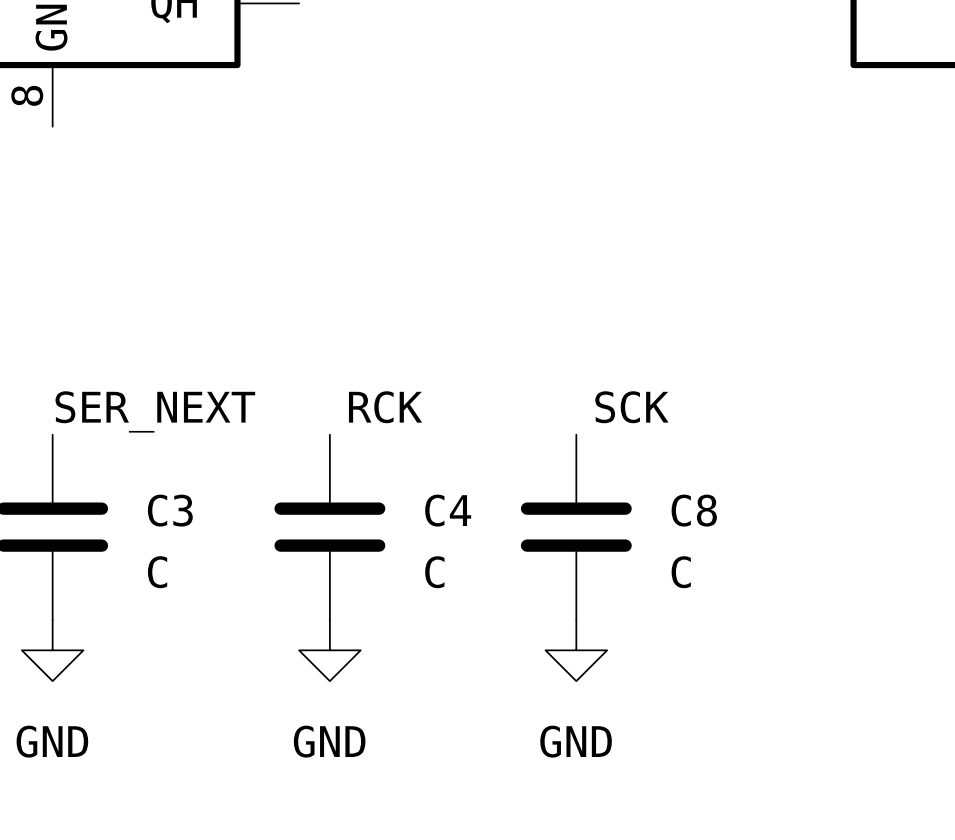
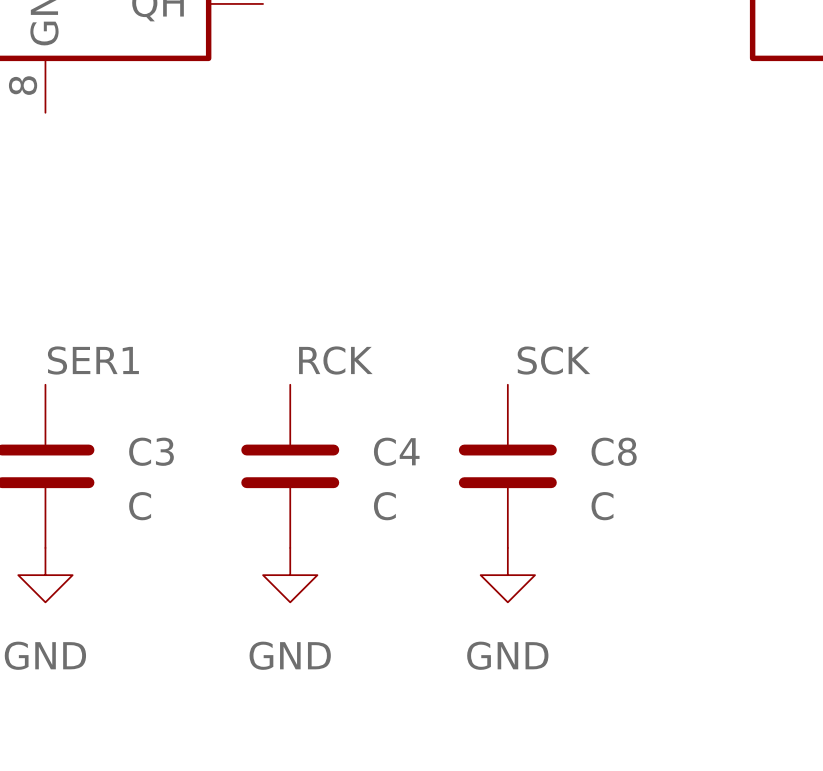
label: SER_NEXT (155, 411) -> SER1 (93, 360)

